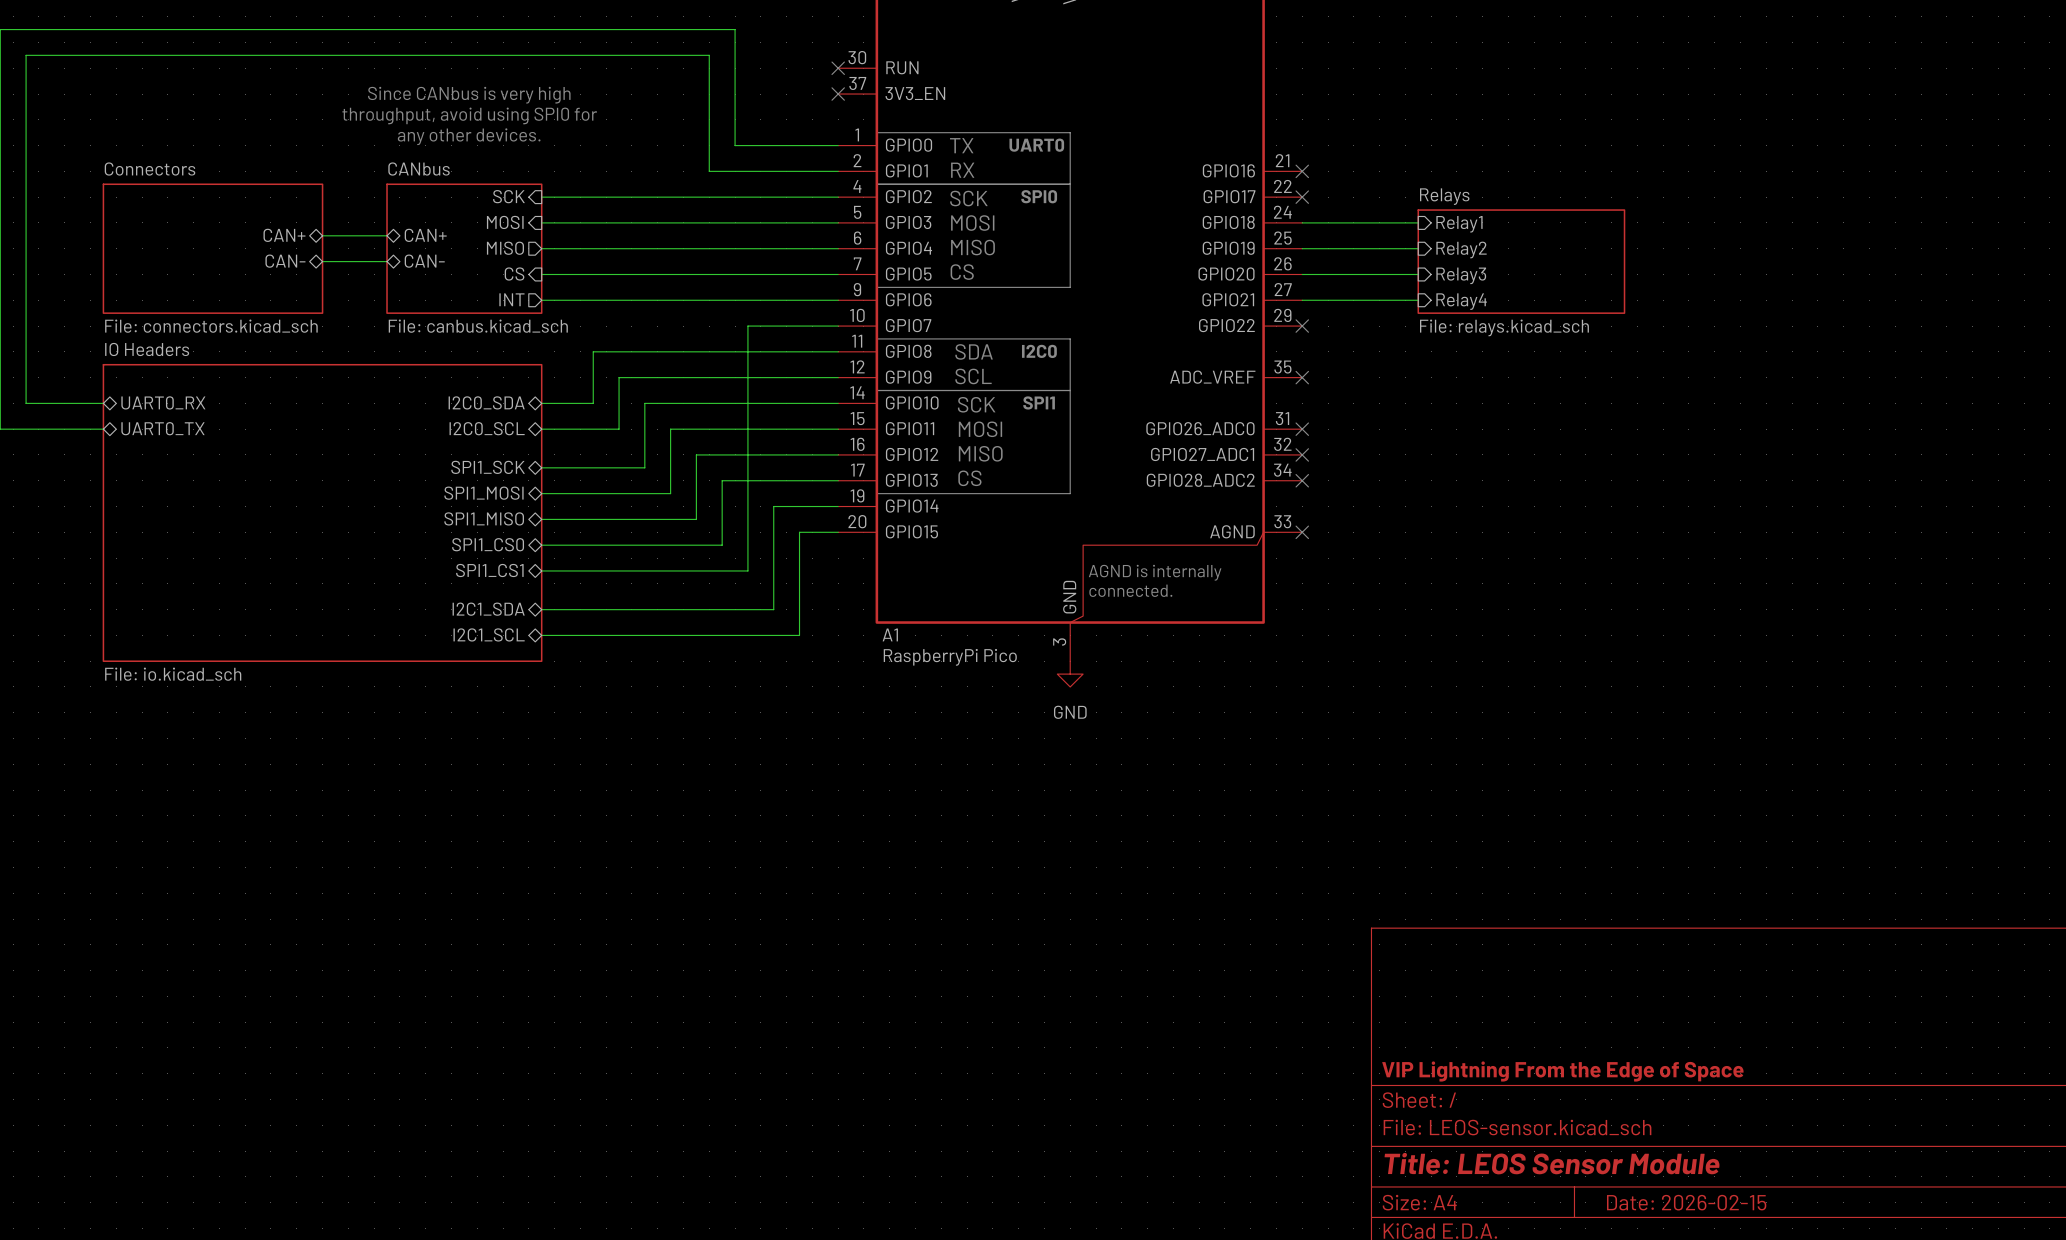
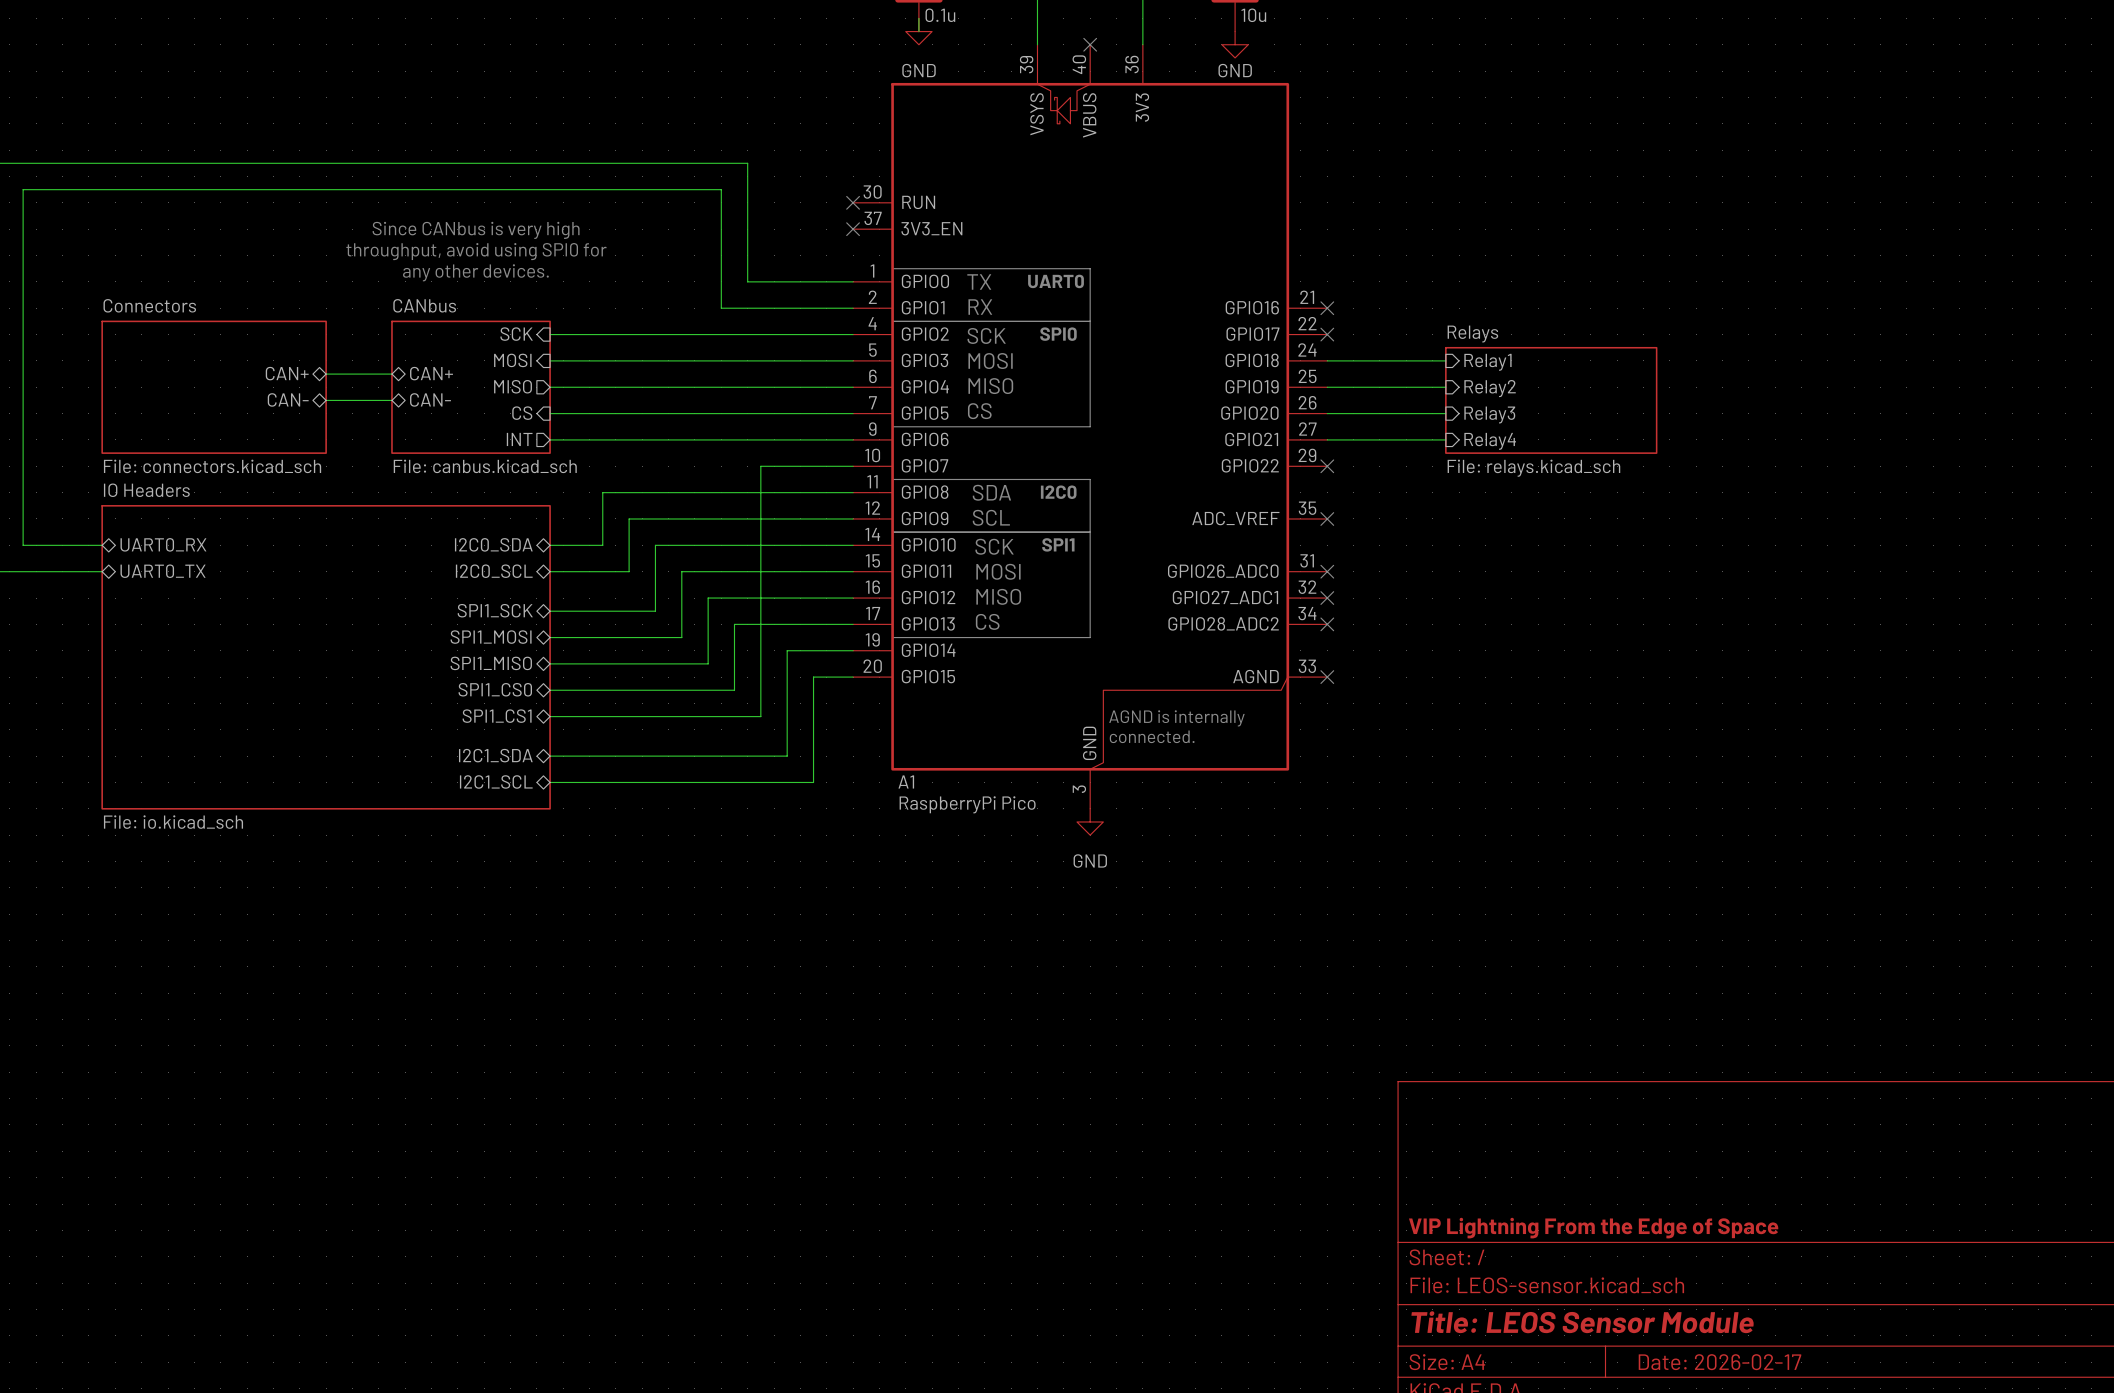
title block: Date: 2026-02-15 (1686, 1202) -> Date: 2026-02-17 (1719, 1362)

